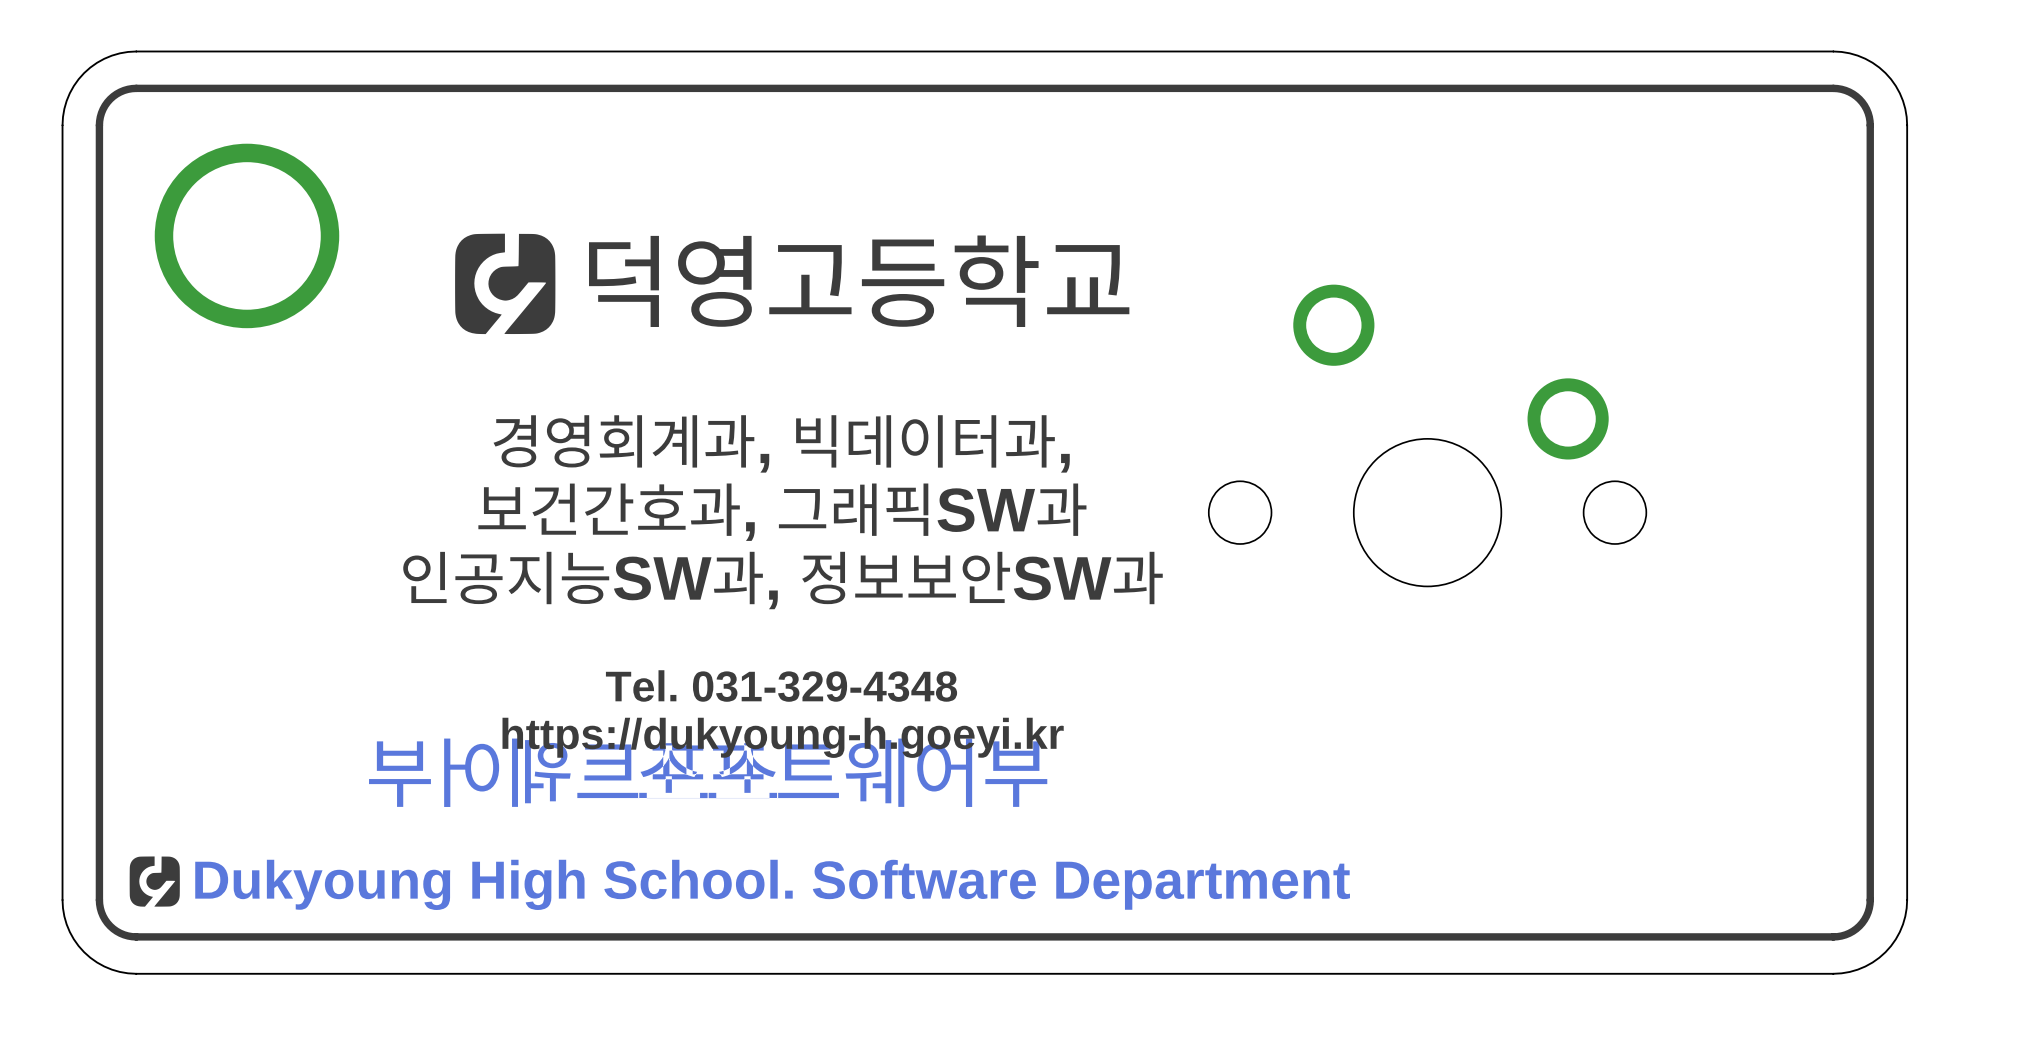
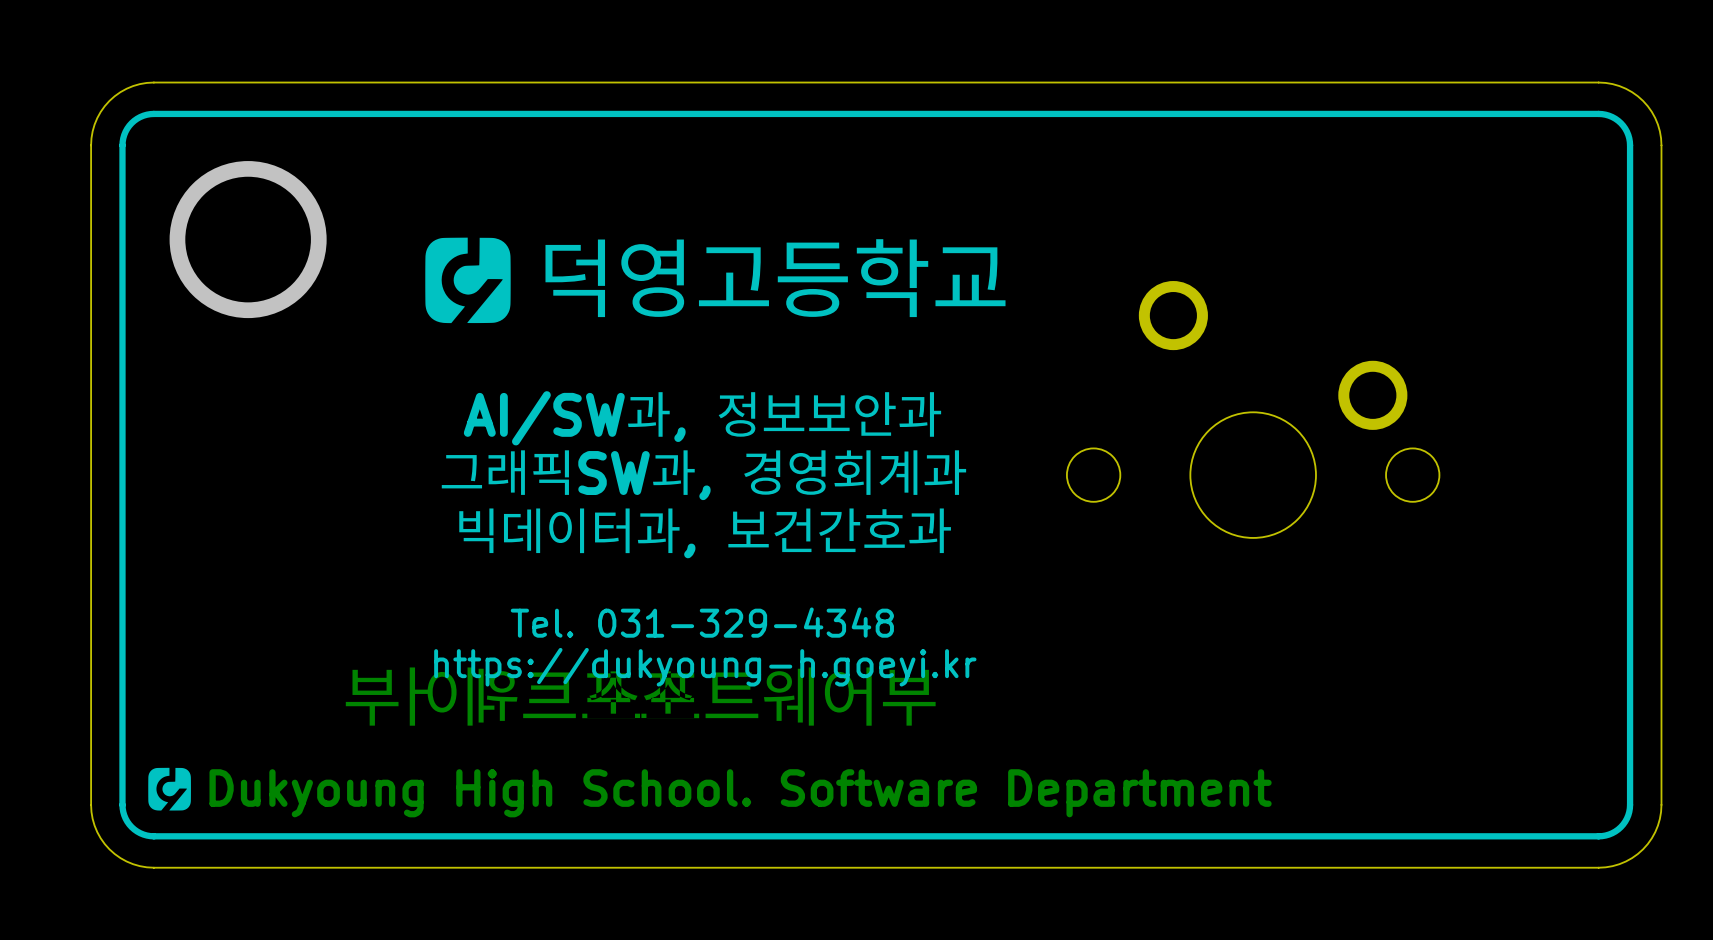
text: 경영회계과, 빅데이터과, (781, 443) -> AI/SW과, 정보보안과 (704, 416)
text: 보건간호과, 그래픽SW과 (782, 512) -> 그래픽SW과, 경영회계과 (703, 473)
text: 인공지능SW과, 정보보안SW과 (783, 580) -> 빅데이터과, 보건간호과 (705, 531)

